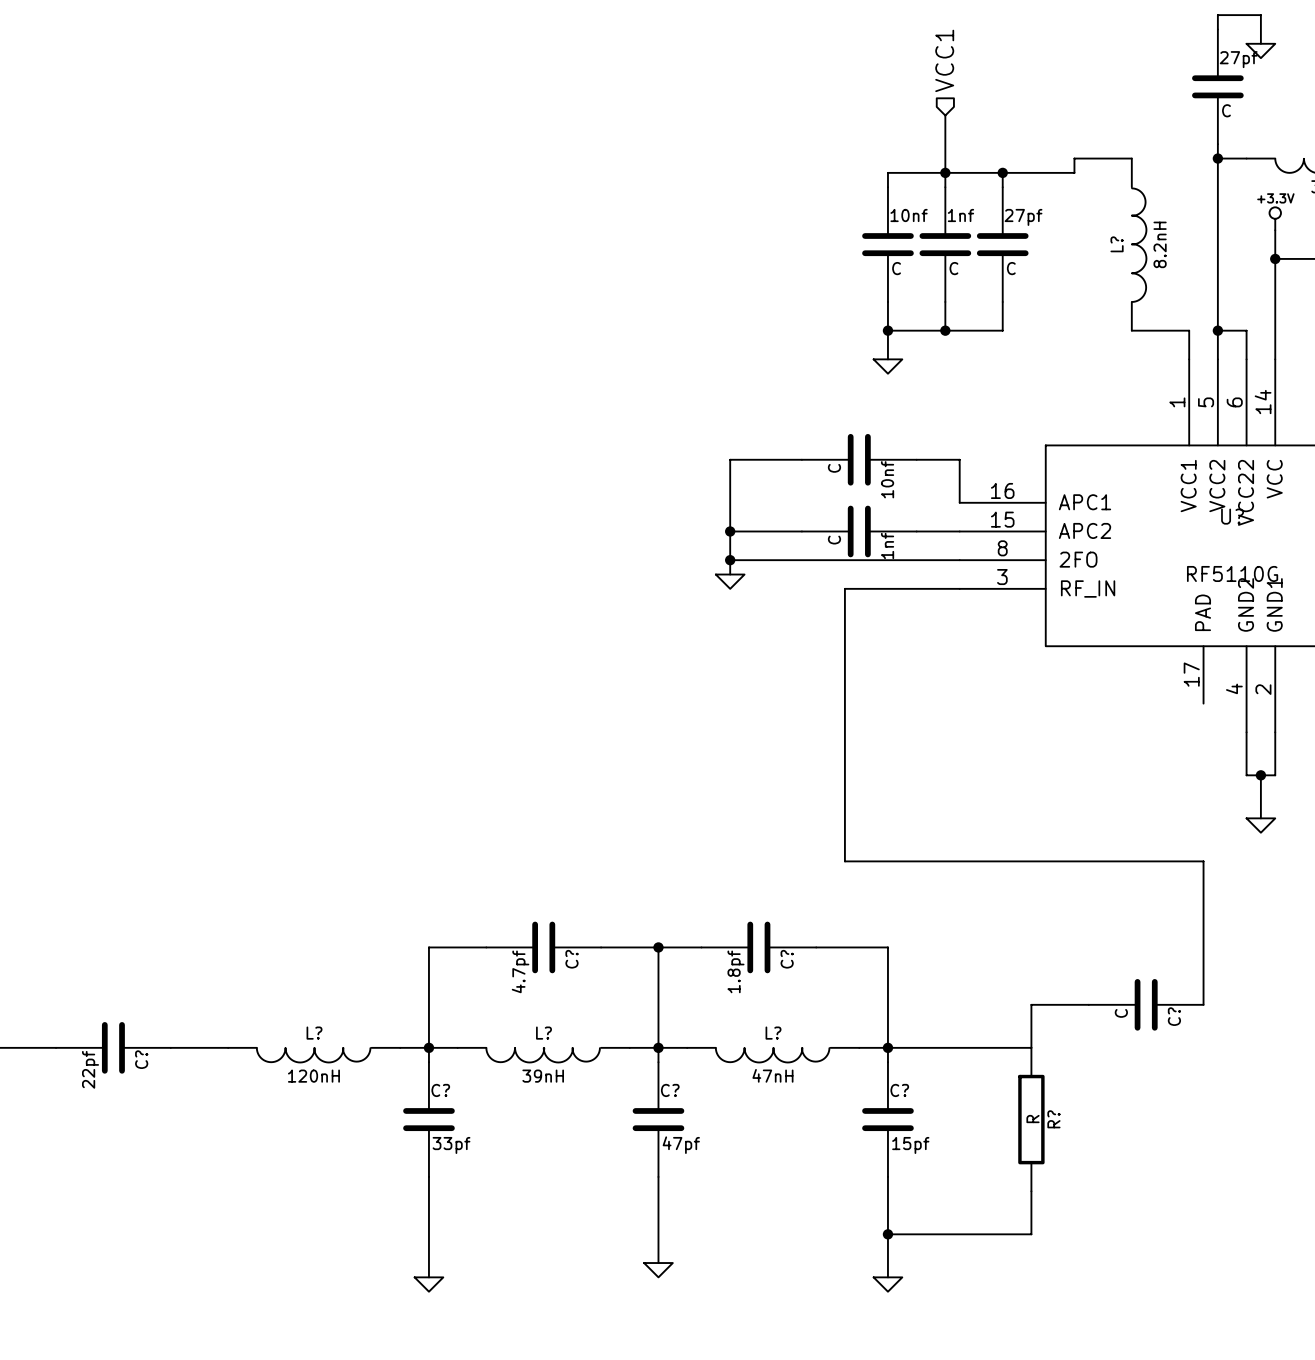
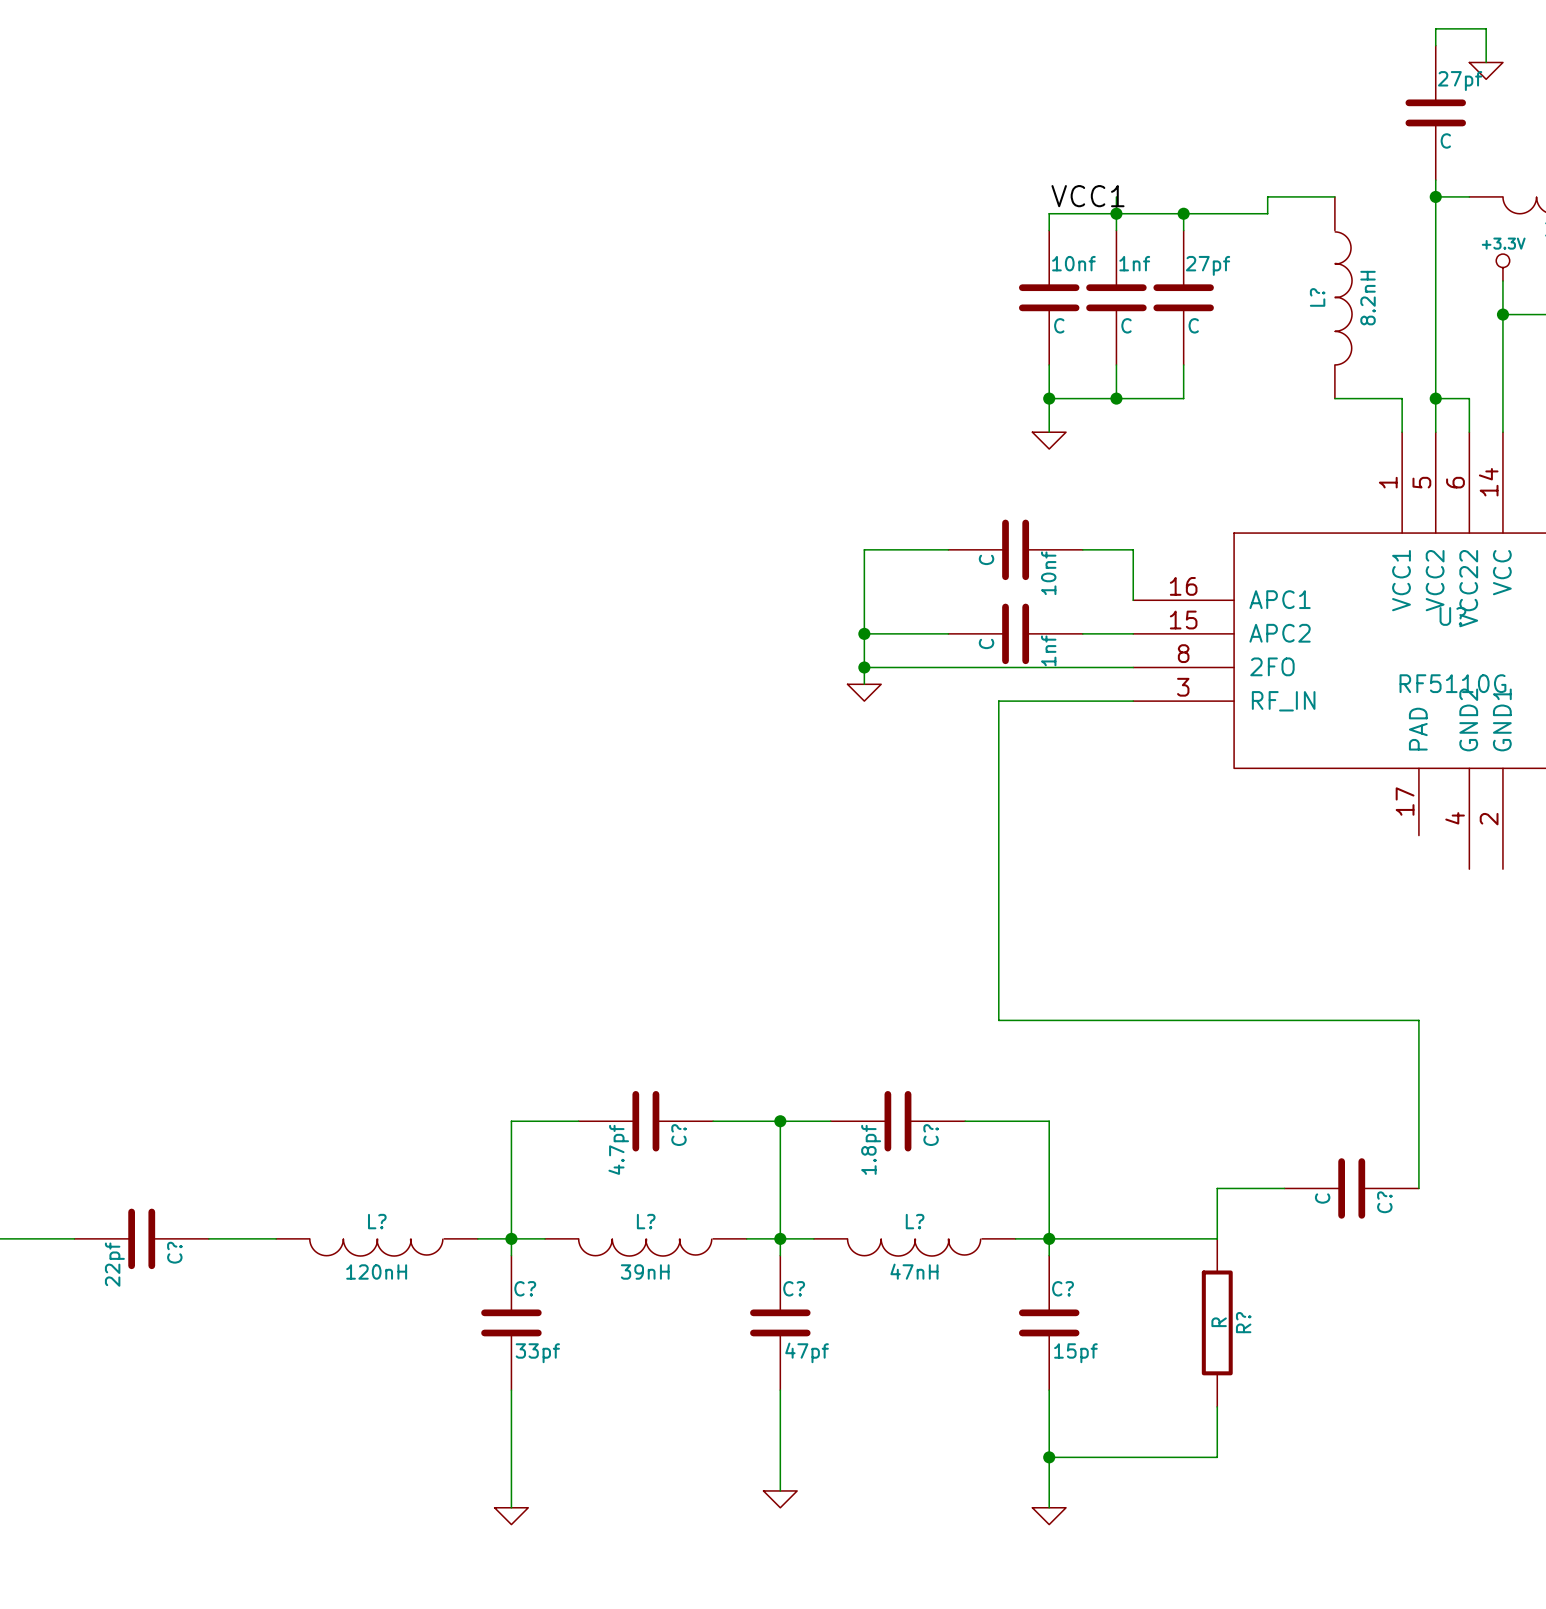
hierarchical label: VCC1 (944, 60) -> none
wire: (945, 115) (945, 158) -> none
label: none -> VCC1 (1087, 196)
wire: (1246, 732) (1246, 775) (1275, 775) (1275, 732) -> none
wire: (1260, 775) (1260, 818) -> none
junction: (1260, 775) -> none
power symbol: (1260, 825) -> none

